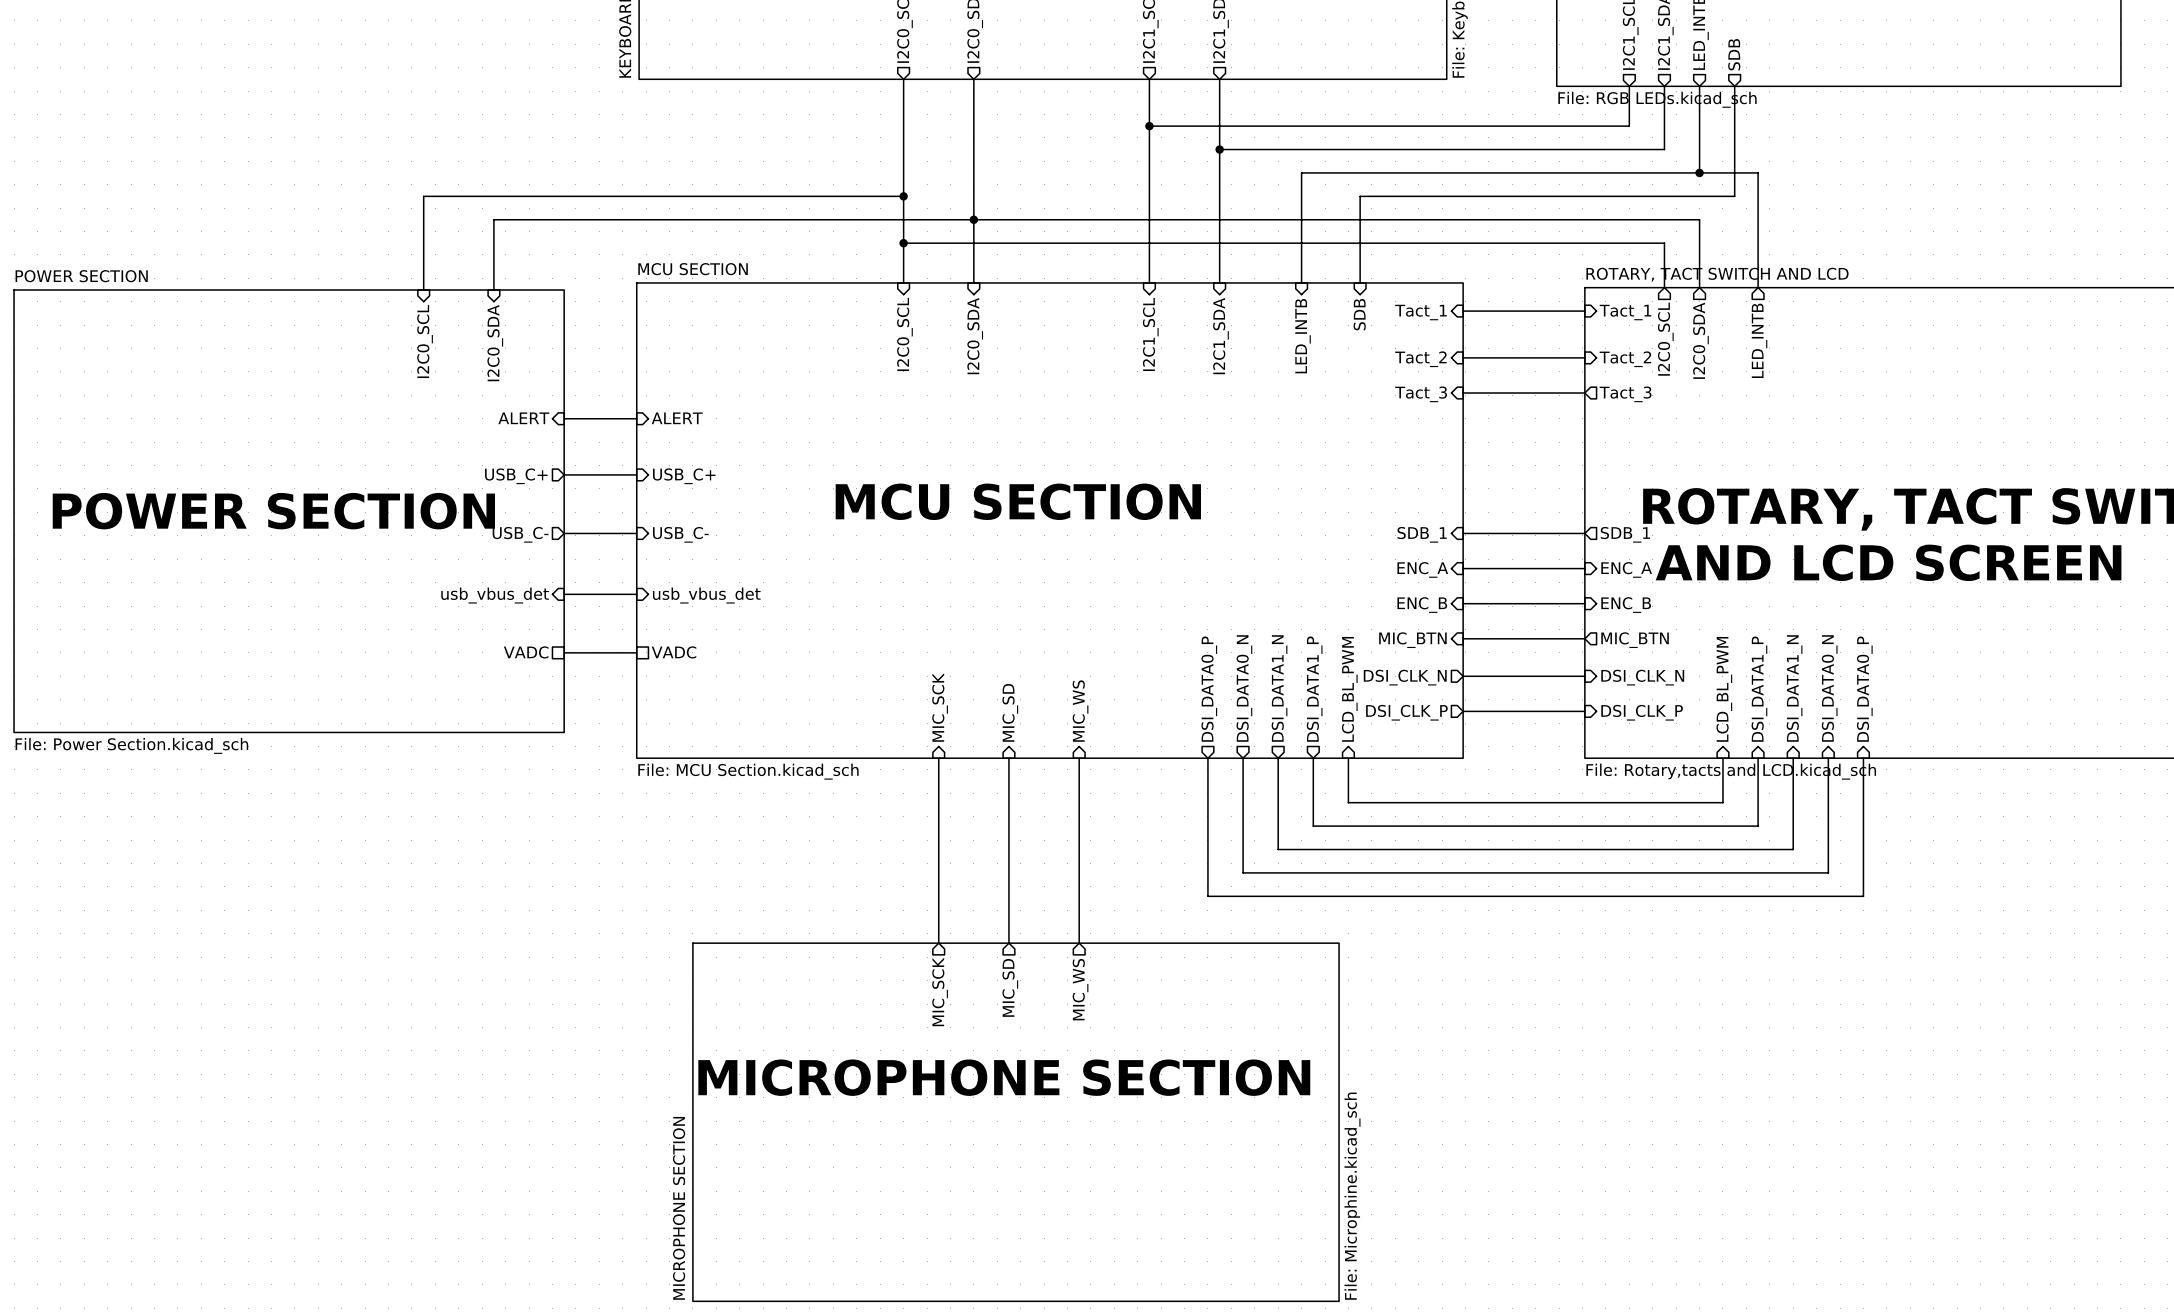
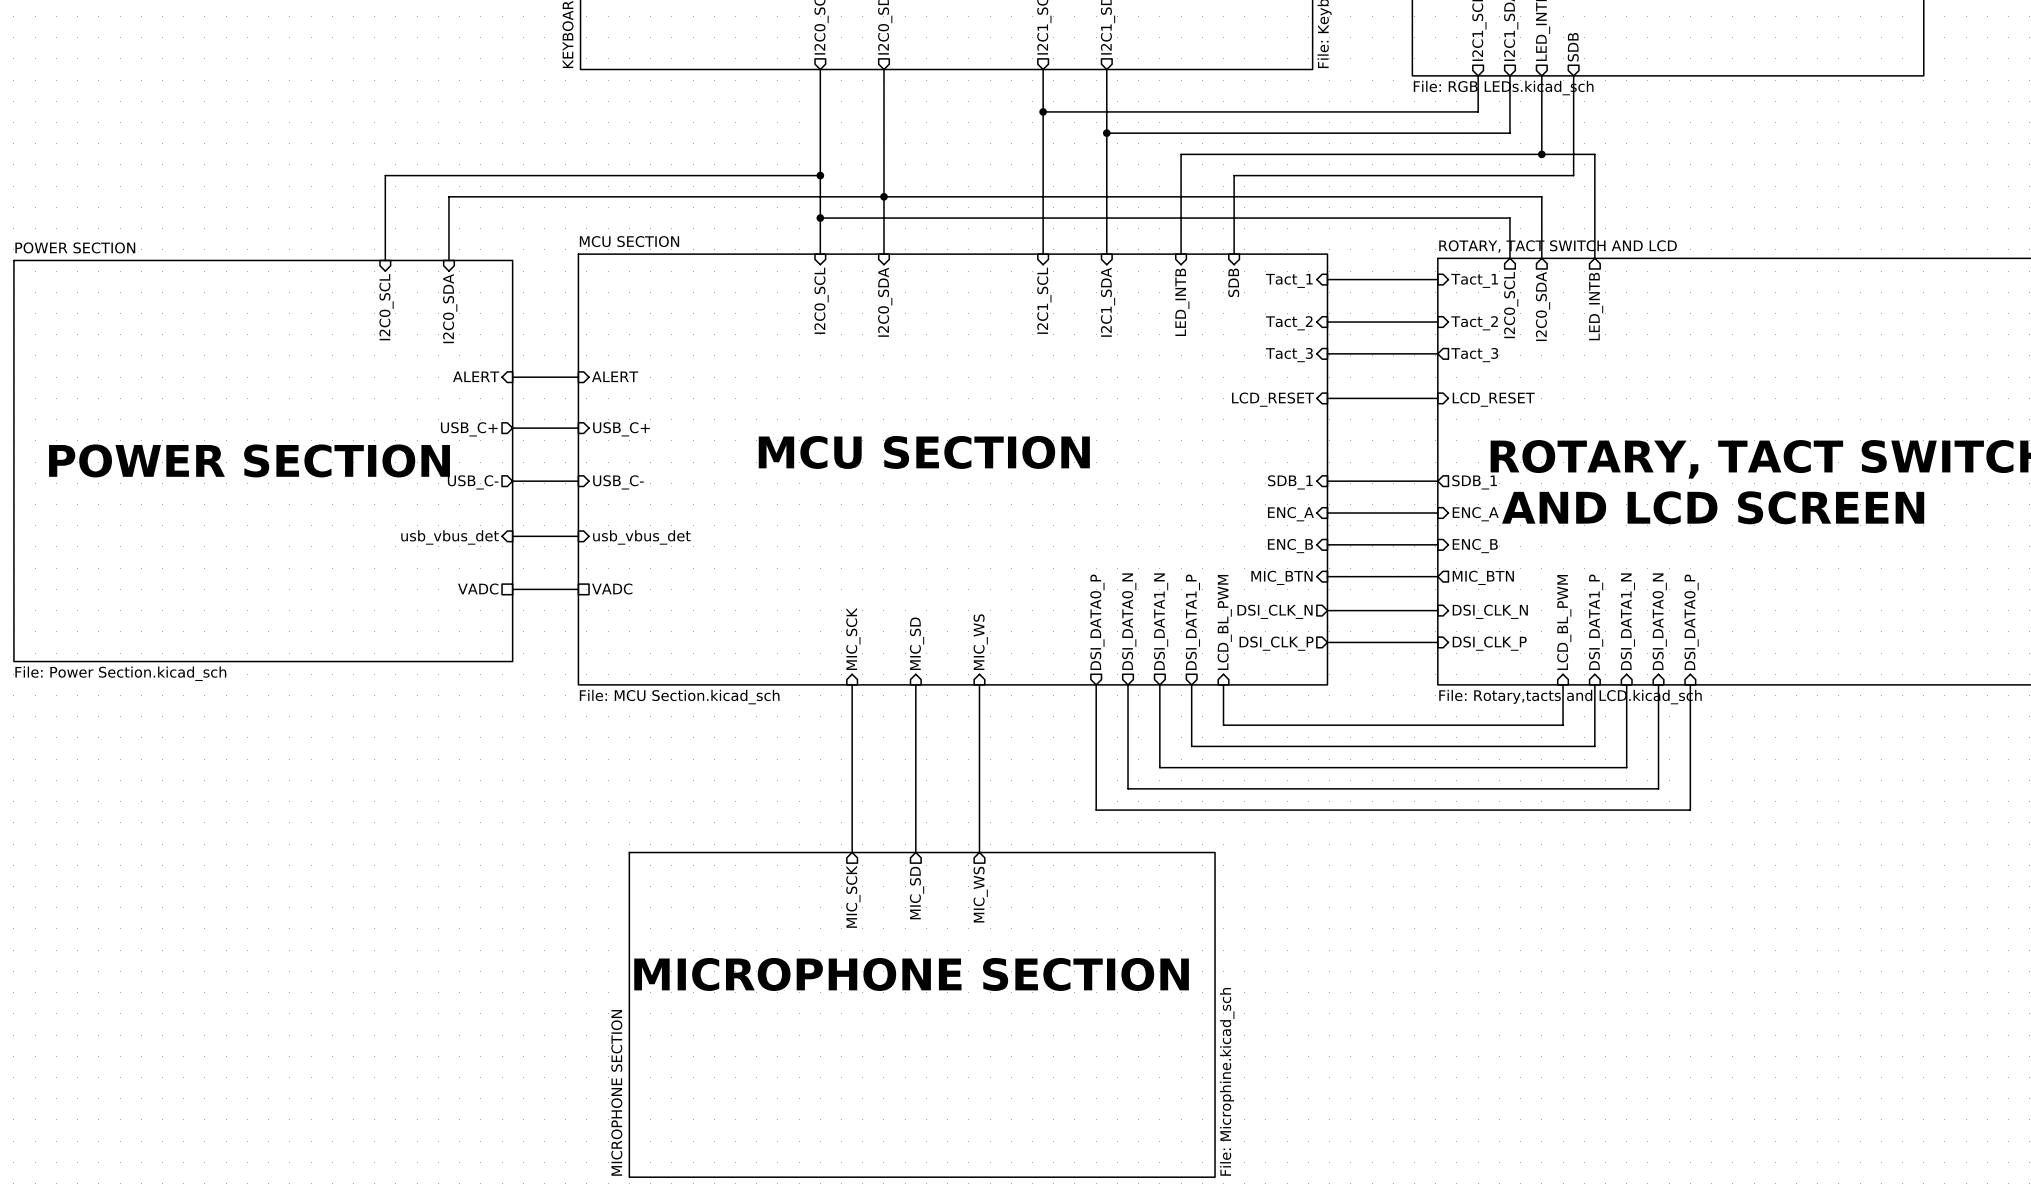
wire: none -> (1327, 398) (1437, 398)
sheet pin: none -> LCD_RESET (1273, 399)
sheet pin: none -> LCD_RESET (1493, 399)

